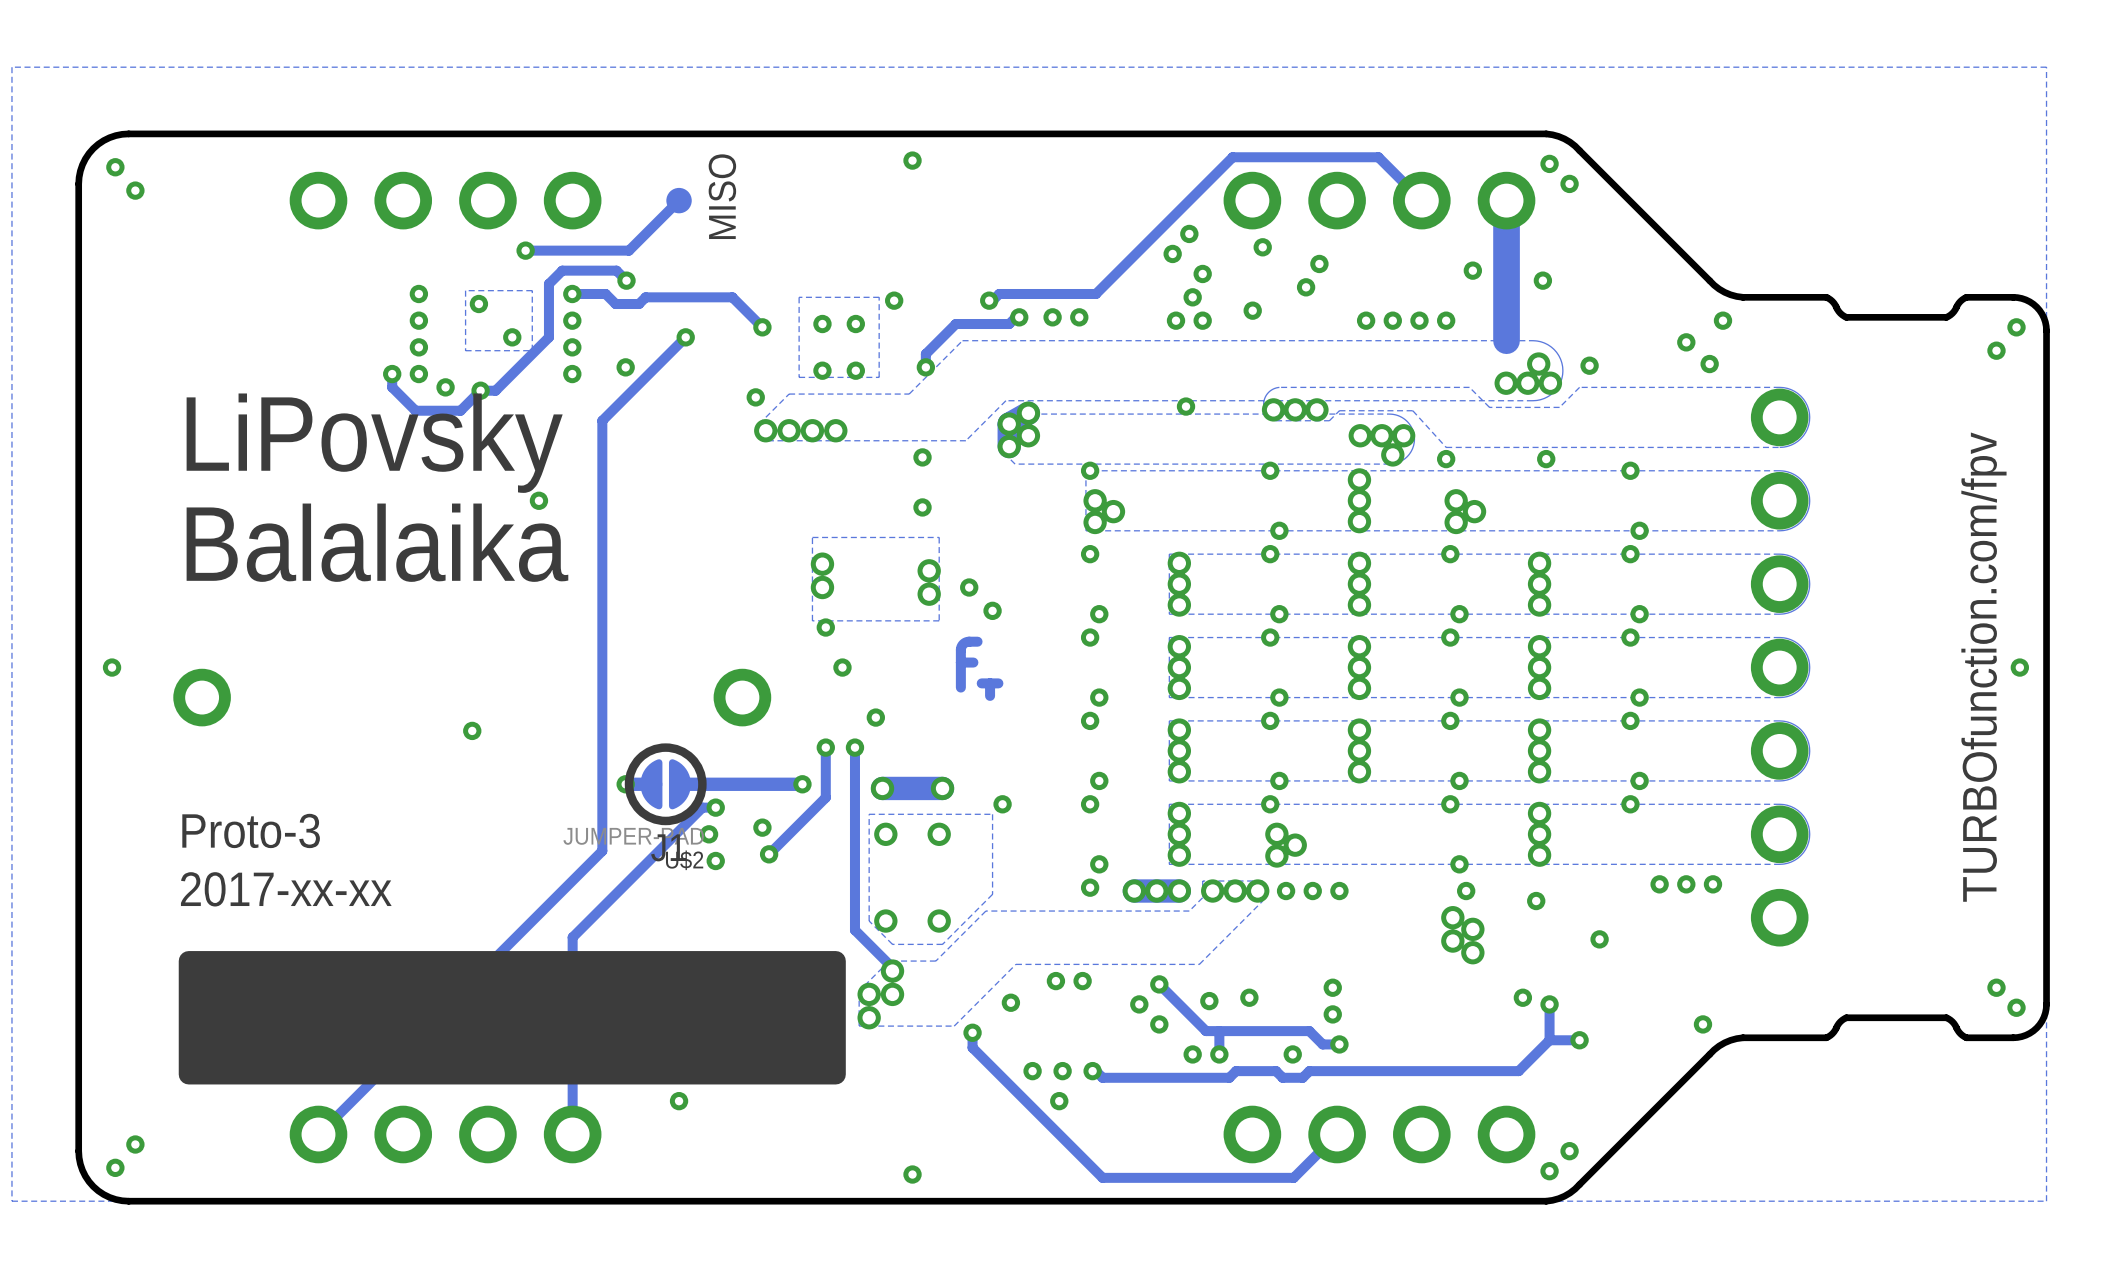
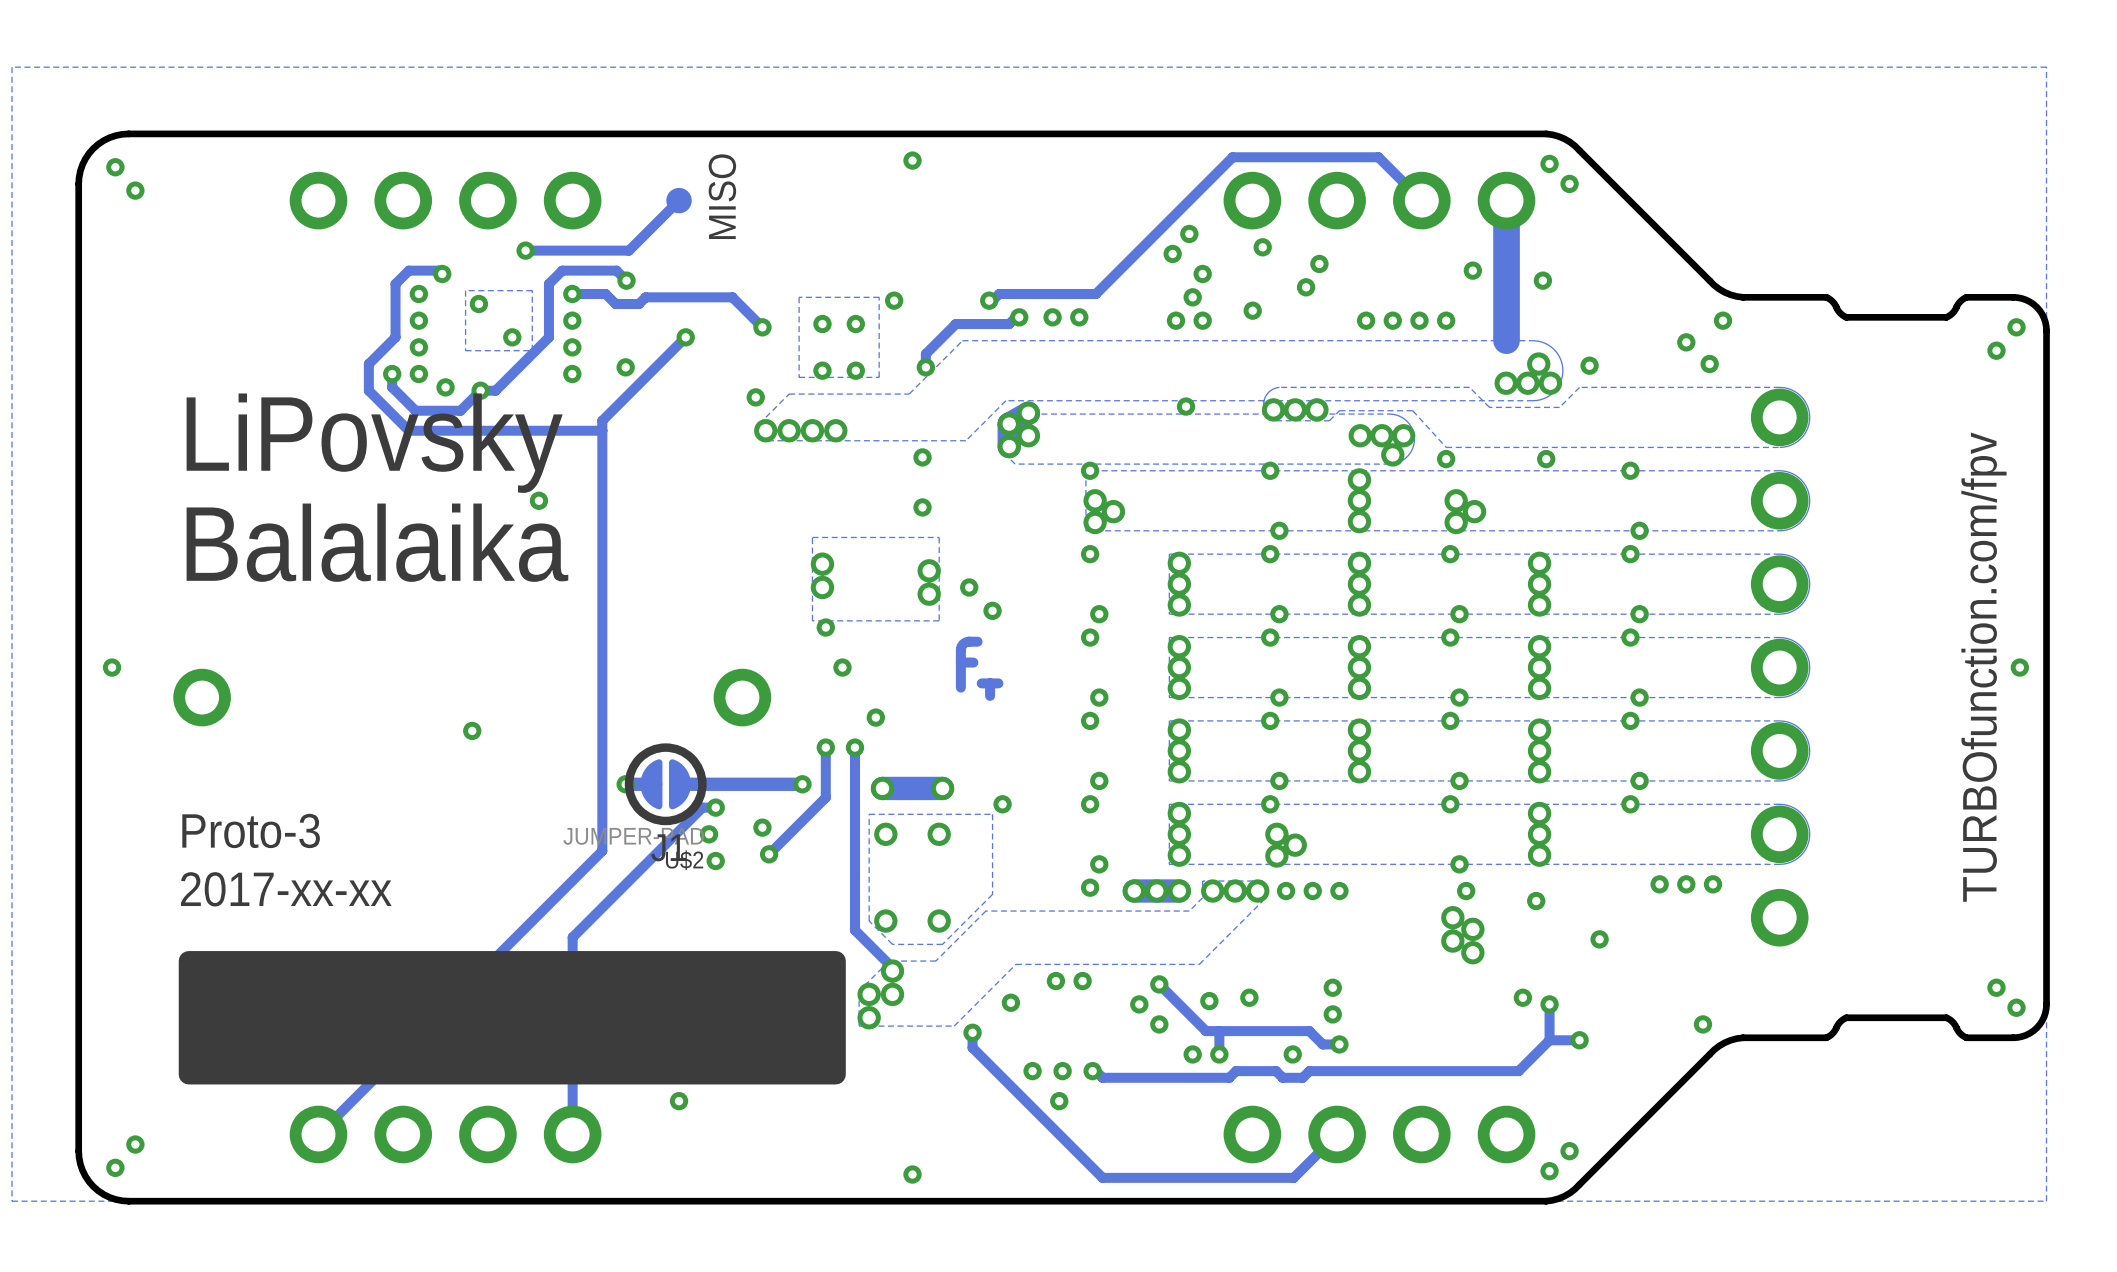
track: none -> (442, 273) (438, 270) (408, 270) (395, 283) (395, 337) (368, 364) (368, 390) (408, 430) (602, 430)
via: none -> (442, 273)

